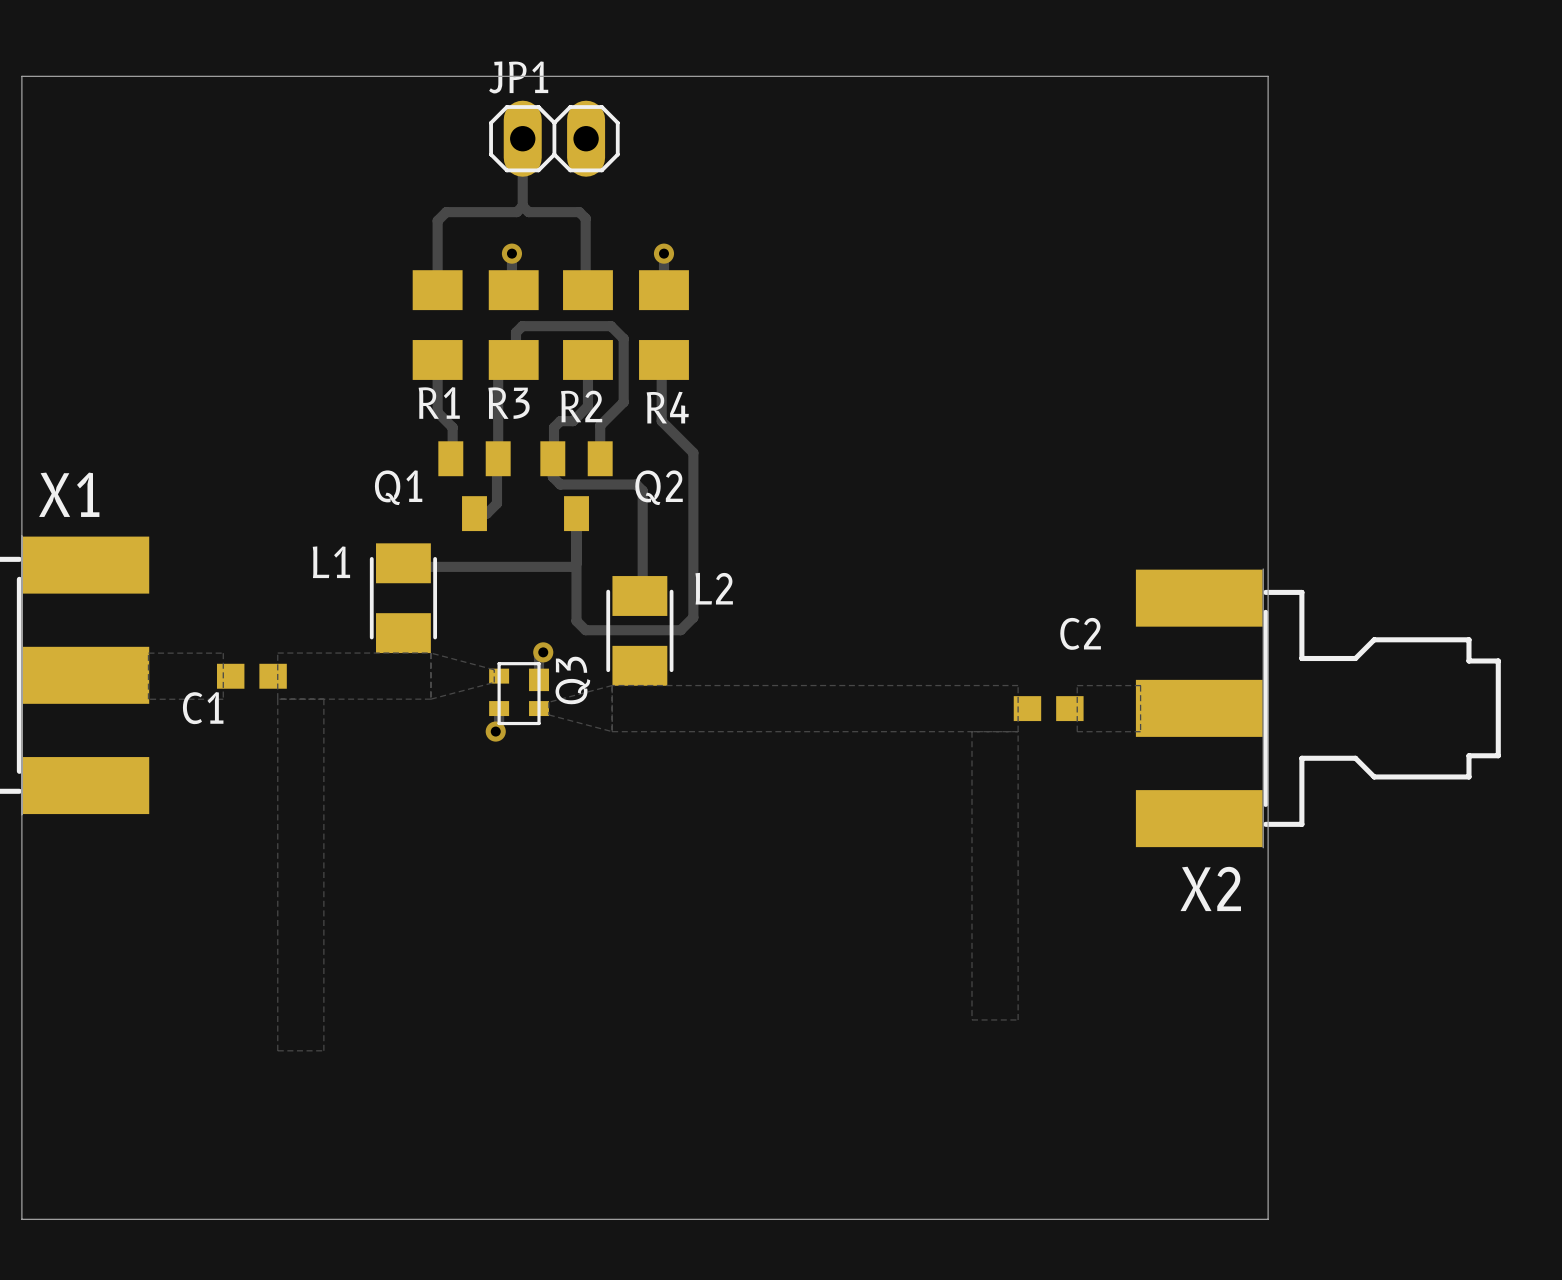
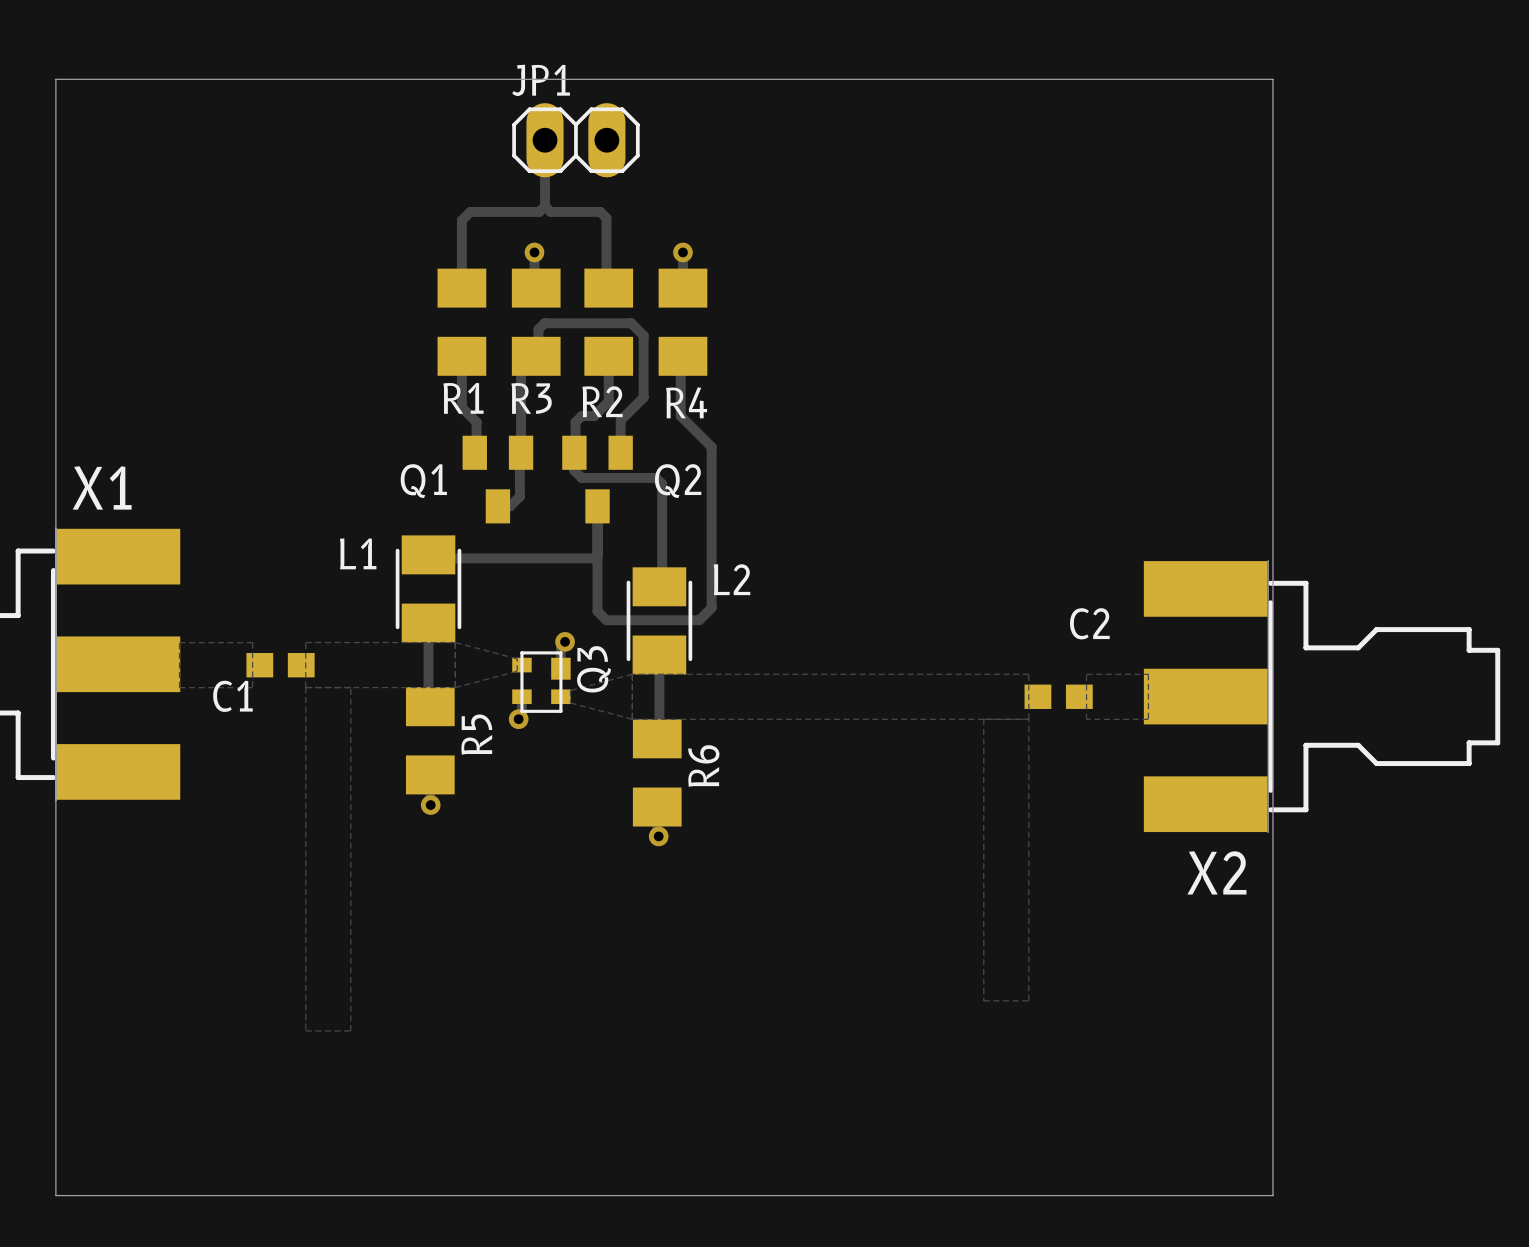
track: none -> (428, 623) (428, 702) (432, 706)
track: none -> (659, 655) (659, 736) (657, 738)
R5: none -> (430, 740)
R6: none -> (657, 772)
via: none -> (430, 805)
via: none -> (658, 836)

